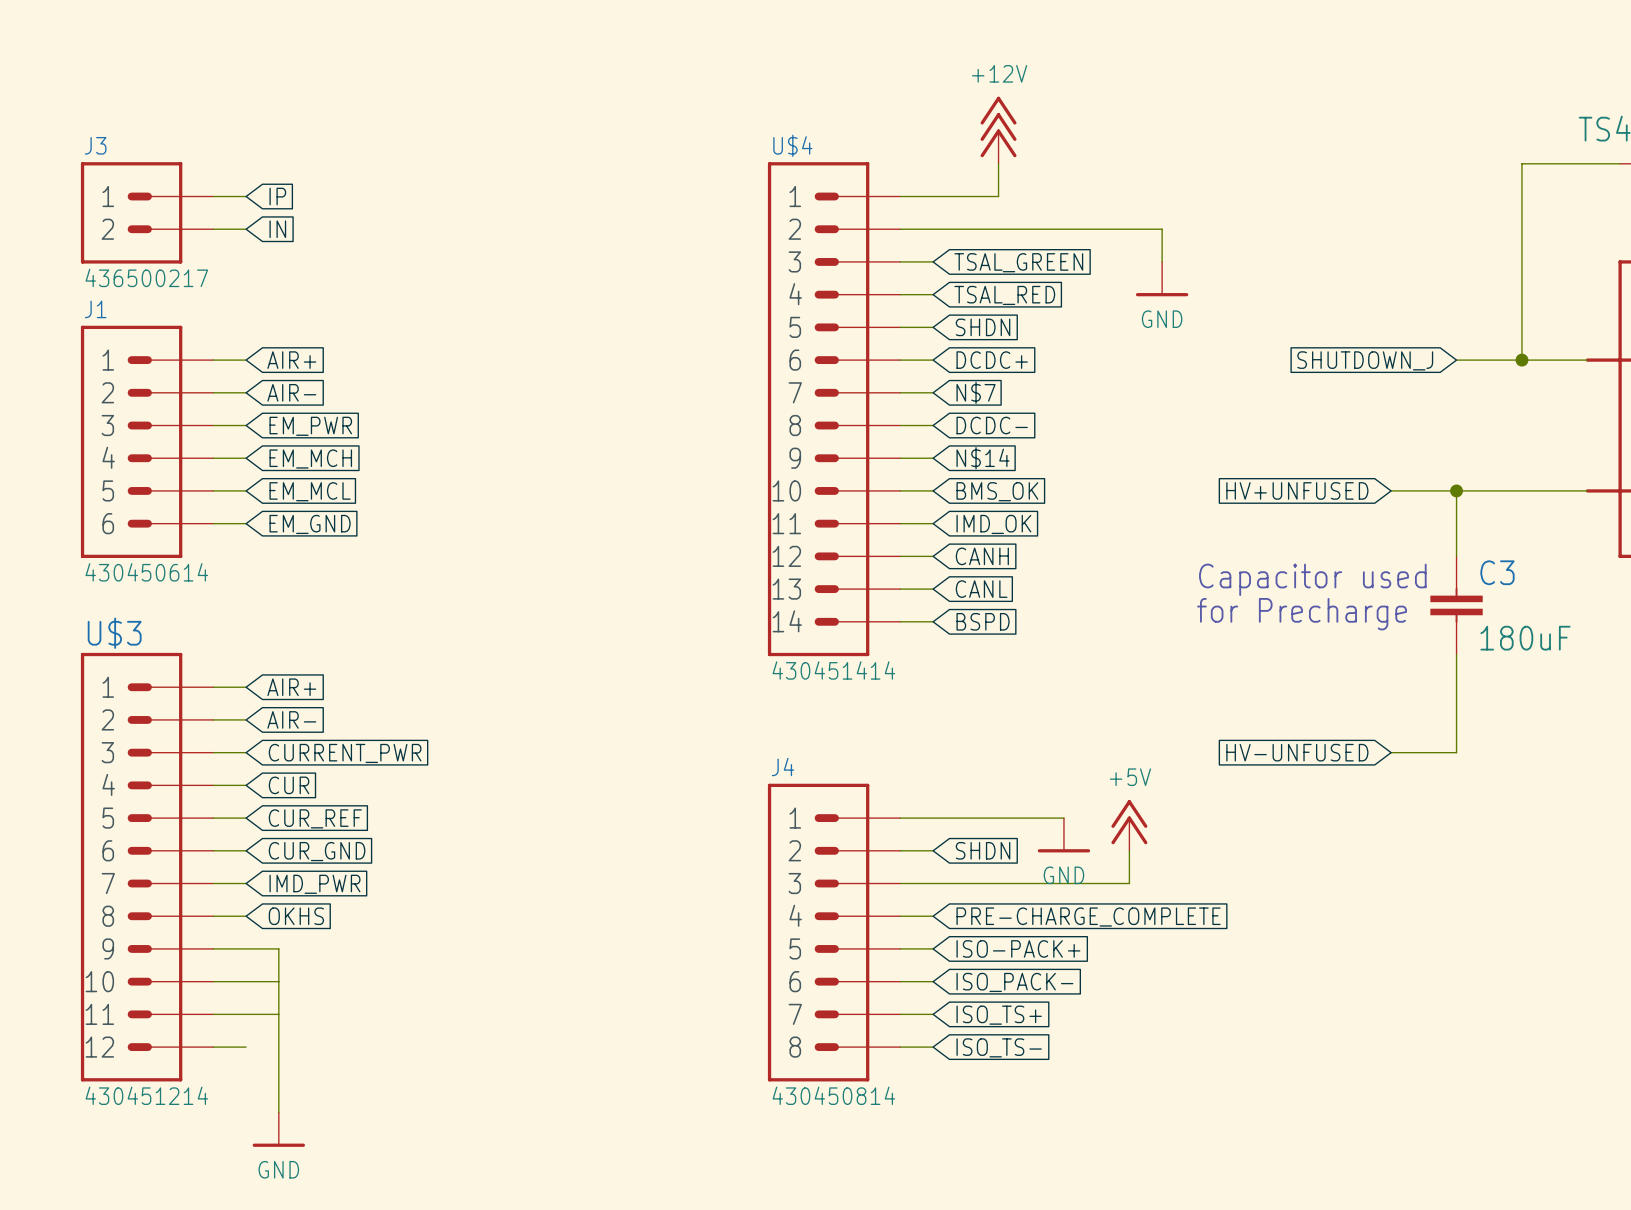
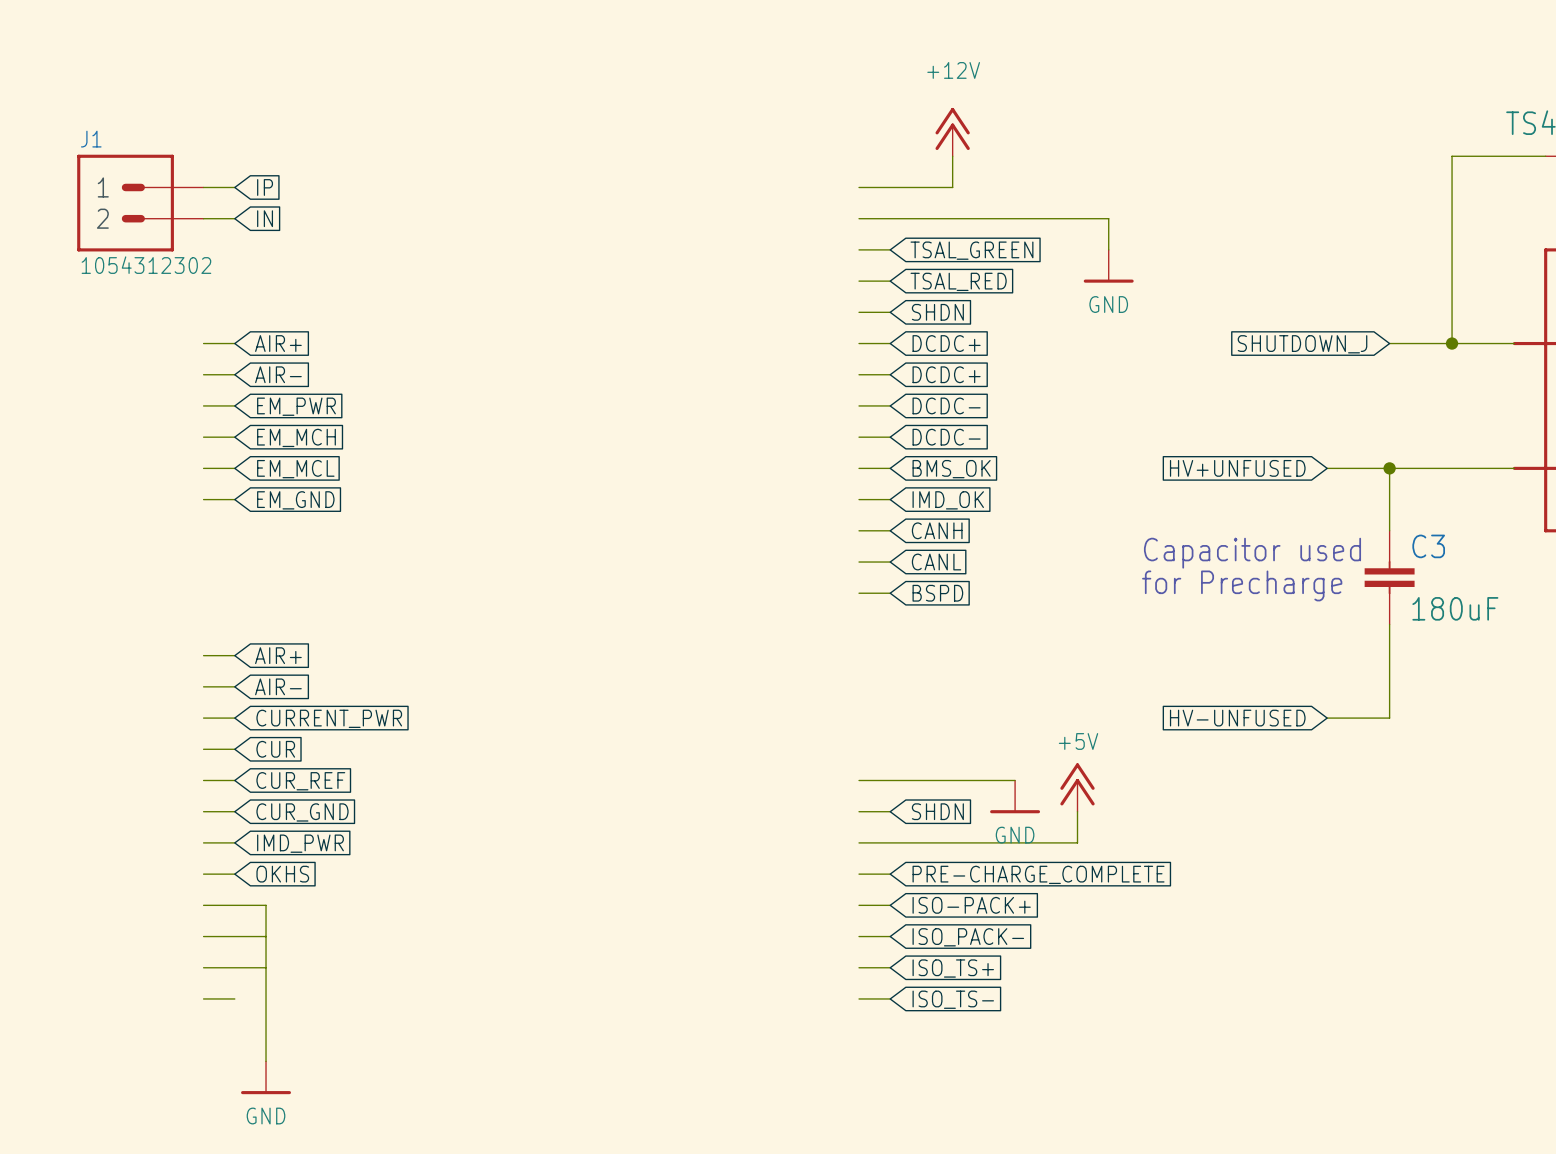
power symbol shape: [980, 96, 1017, 164] -> [935, 107, 970, 157]
J3 name: J3 (95, 145) -> J1 (91, 139)
J3 text: 436500217 (146, 277) -> 1054312302 (146, 265)
global label: N$7 (976, 392) -> DCDC+ (946, 374)
U$4: (834, 409) -> none
J1: (147, 441) -> none
global label: N$14 (983, 458) -> DCDC- (946, 437)
U$3: (147, 867) -> none
J4: (834, 932) -> none

